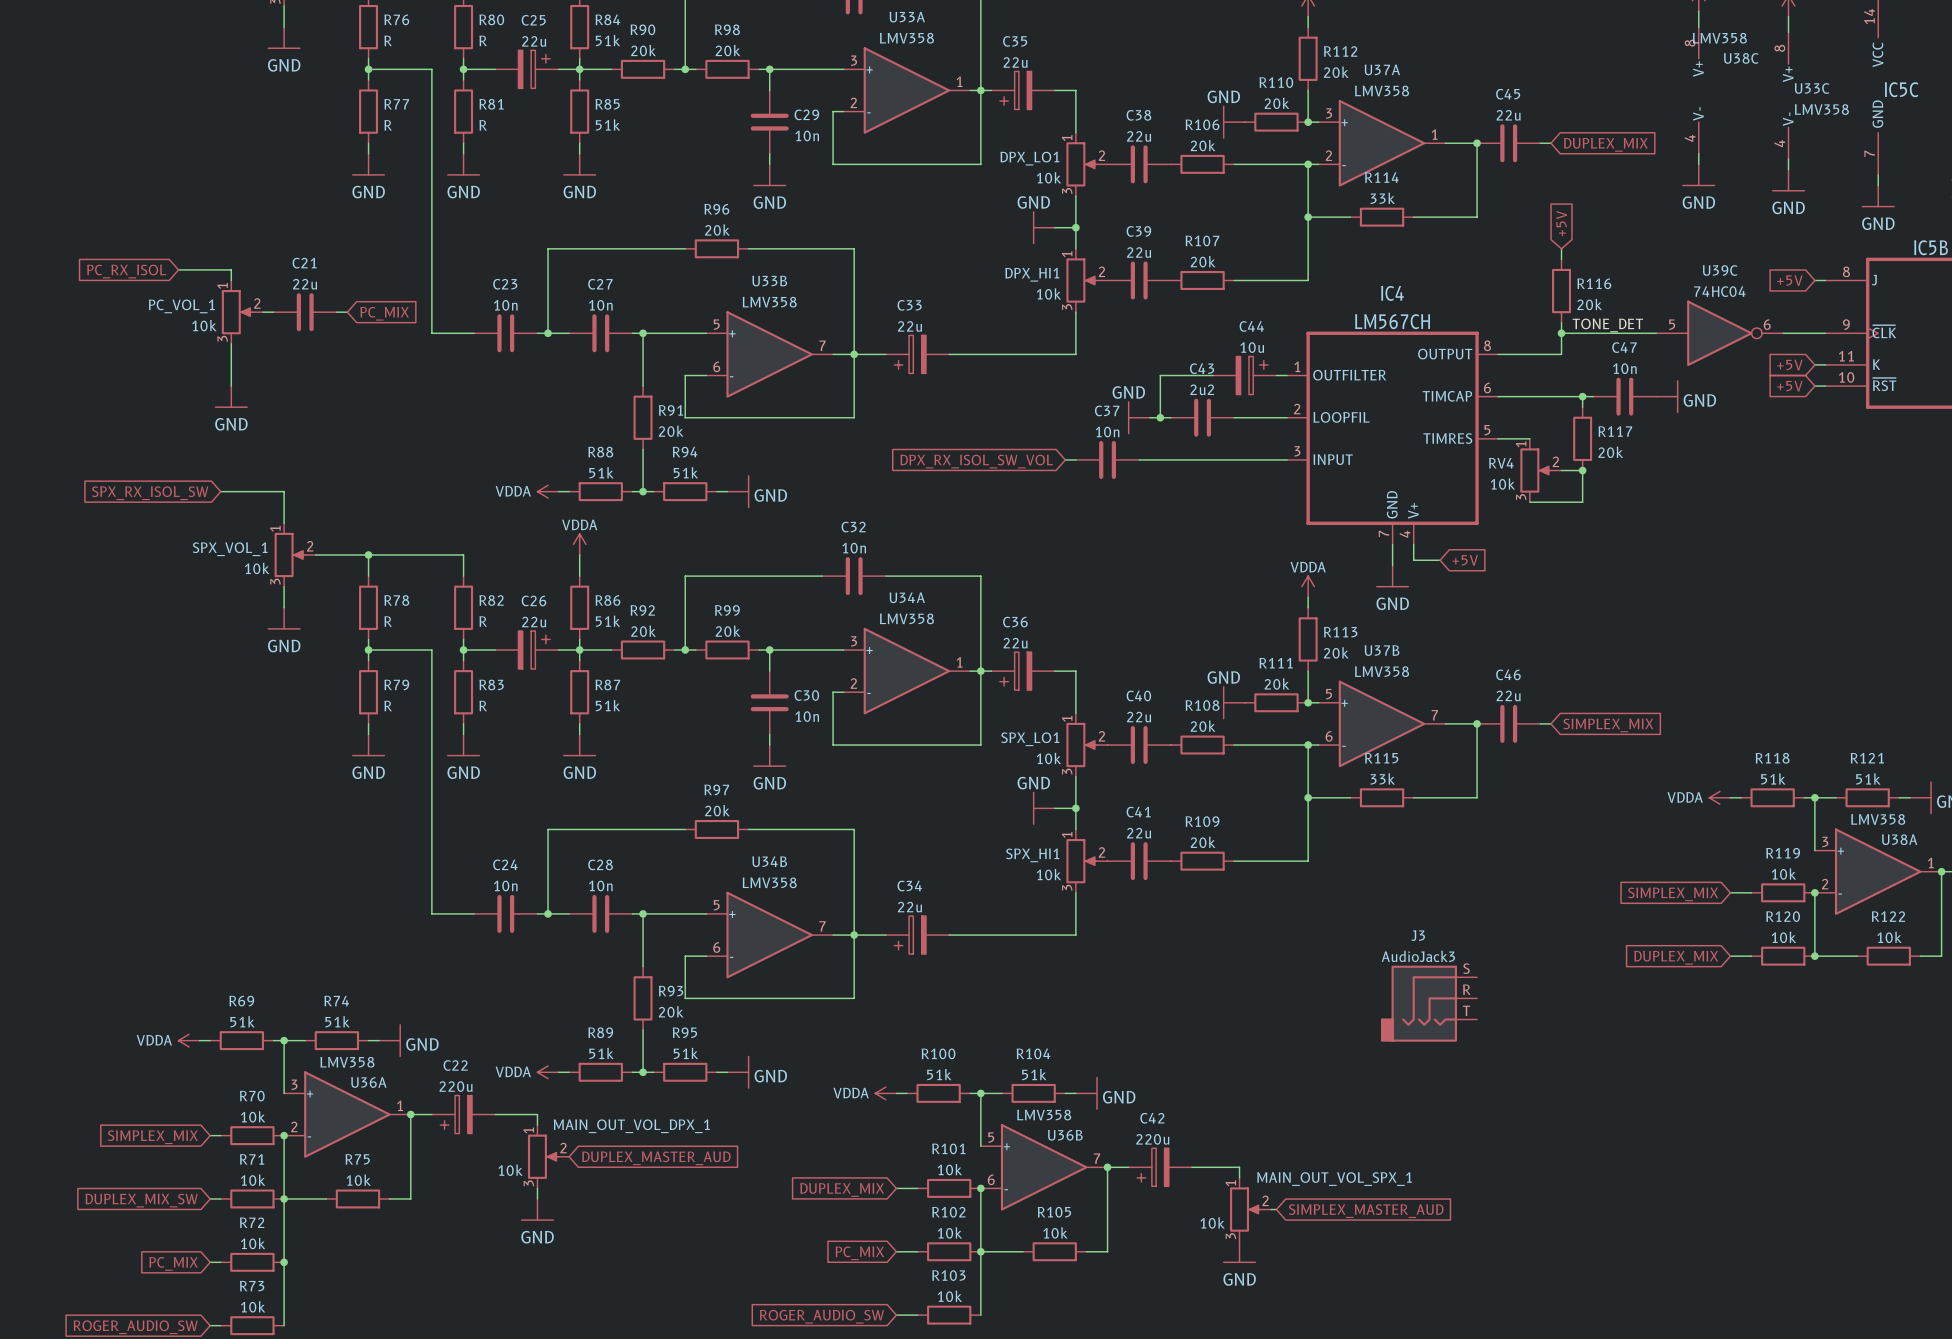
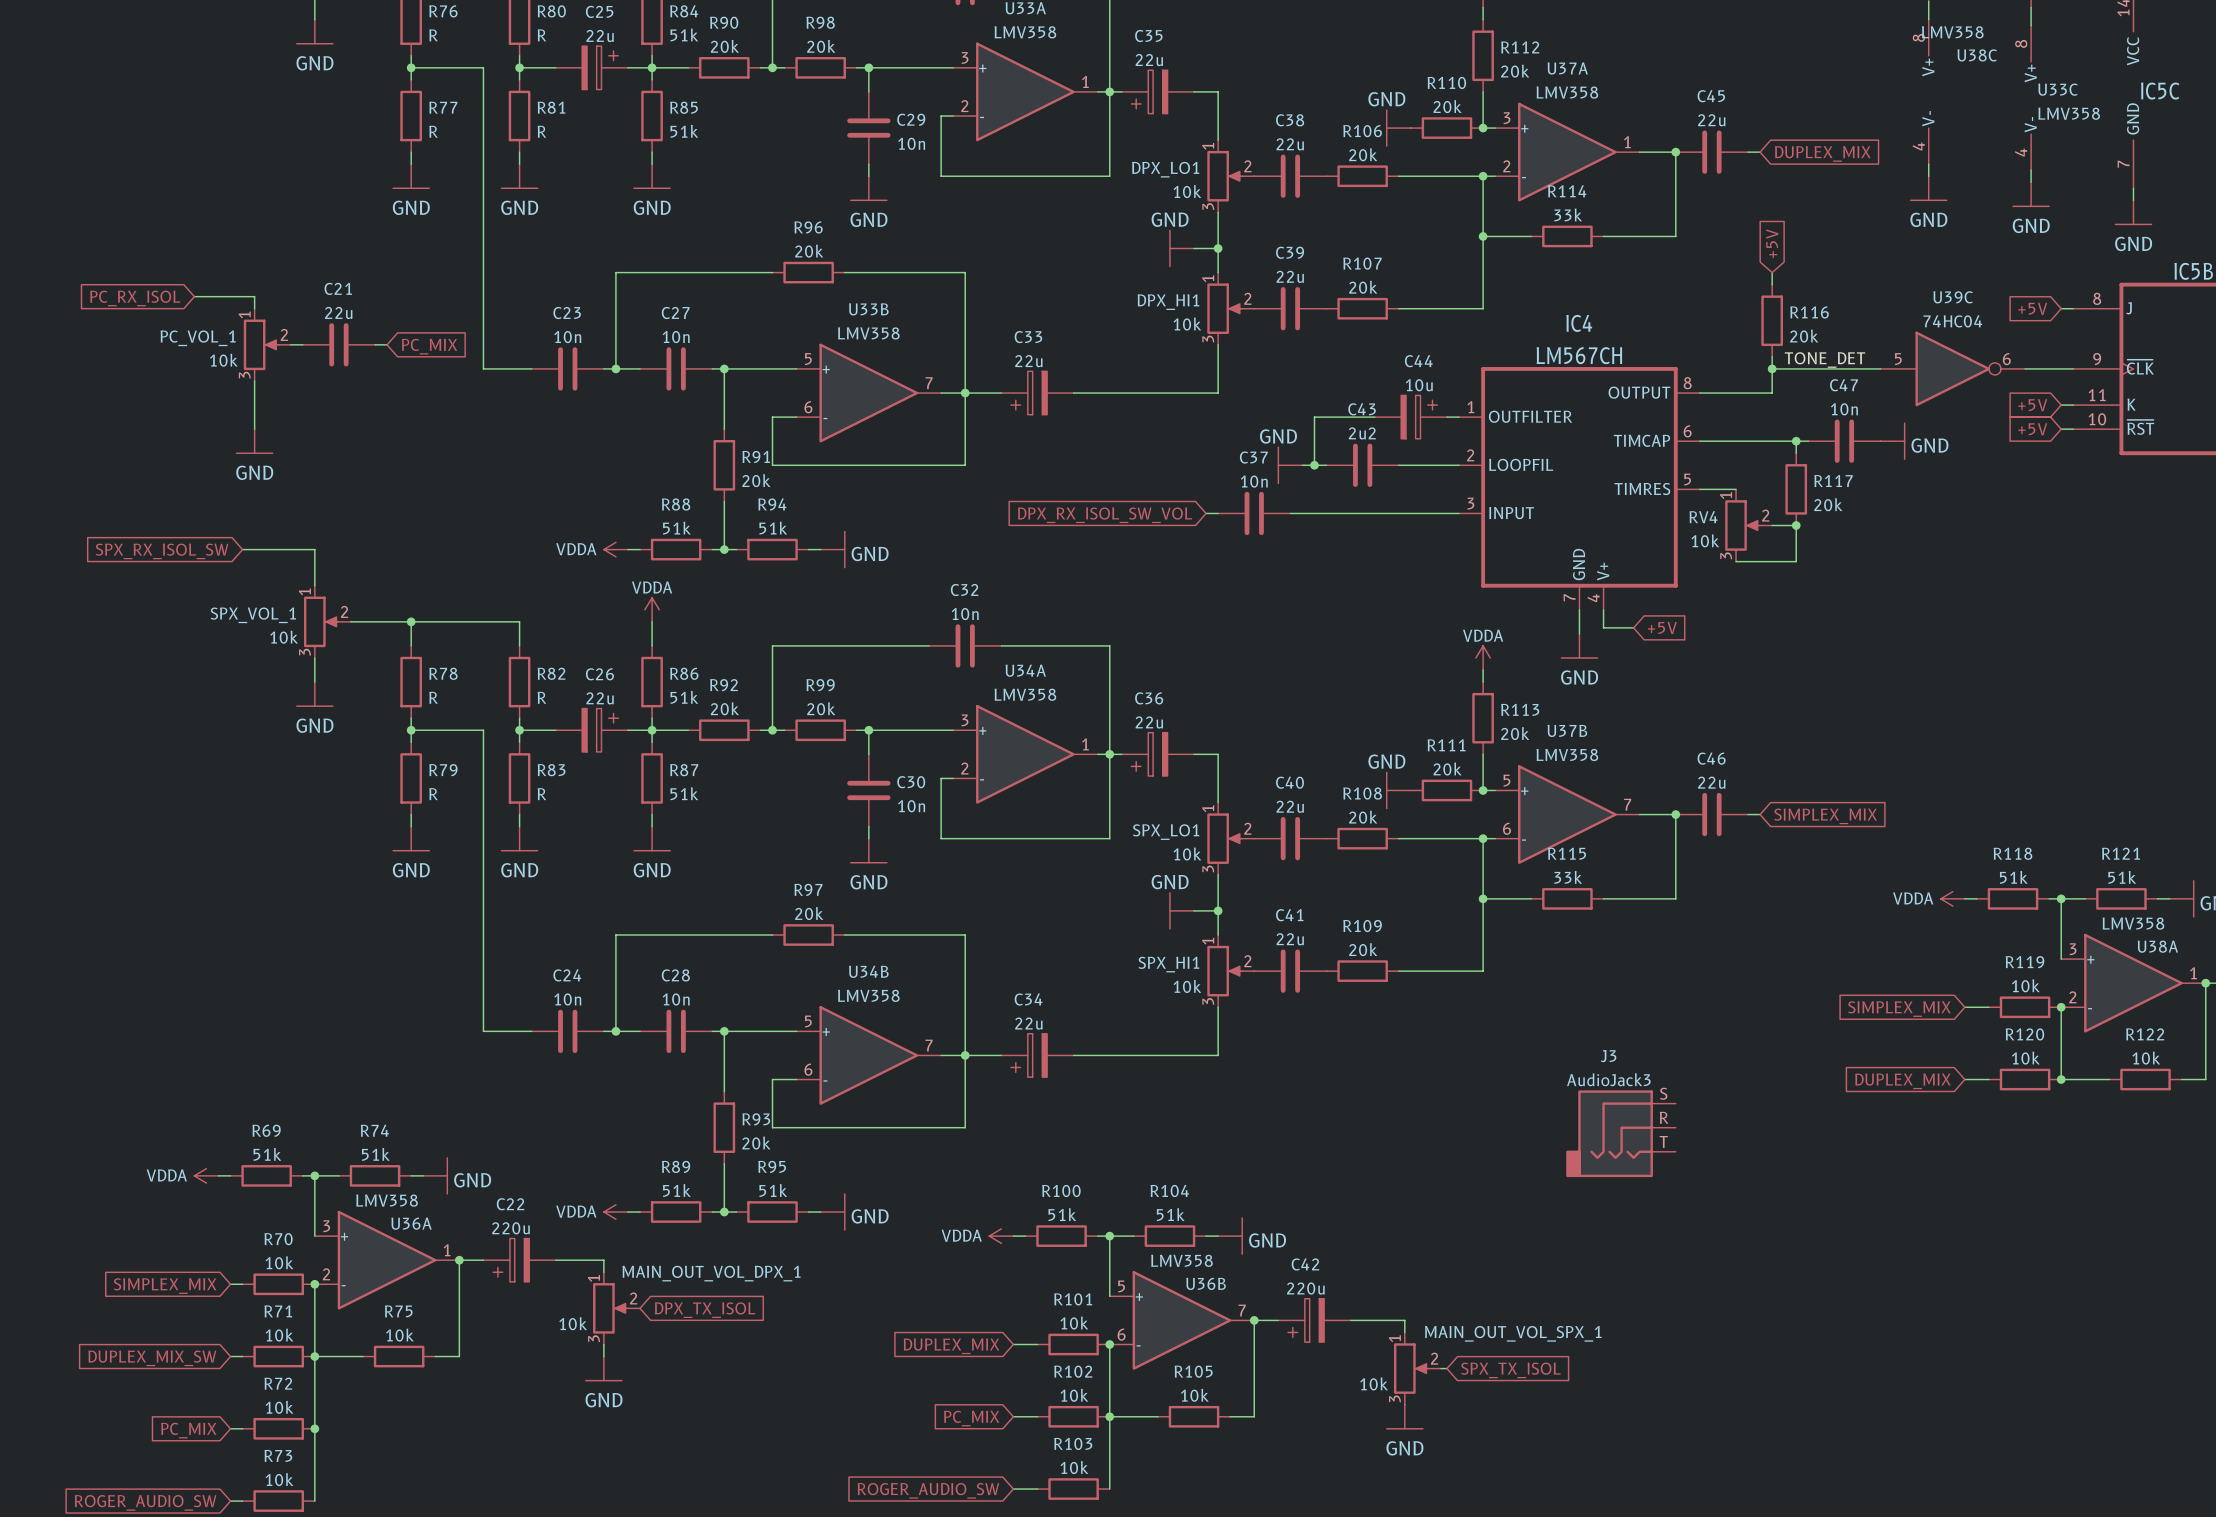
global label: DUPLEX_MASTER_AUD (656, 1158) -> DPX_TX_ISOL (705, 1310)
global label: SIMPLEX_MASTER_AUD (1366, 1211) -> SPX_TX_ISOL (1510, 1370)

